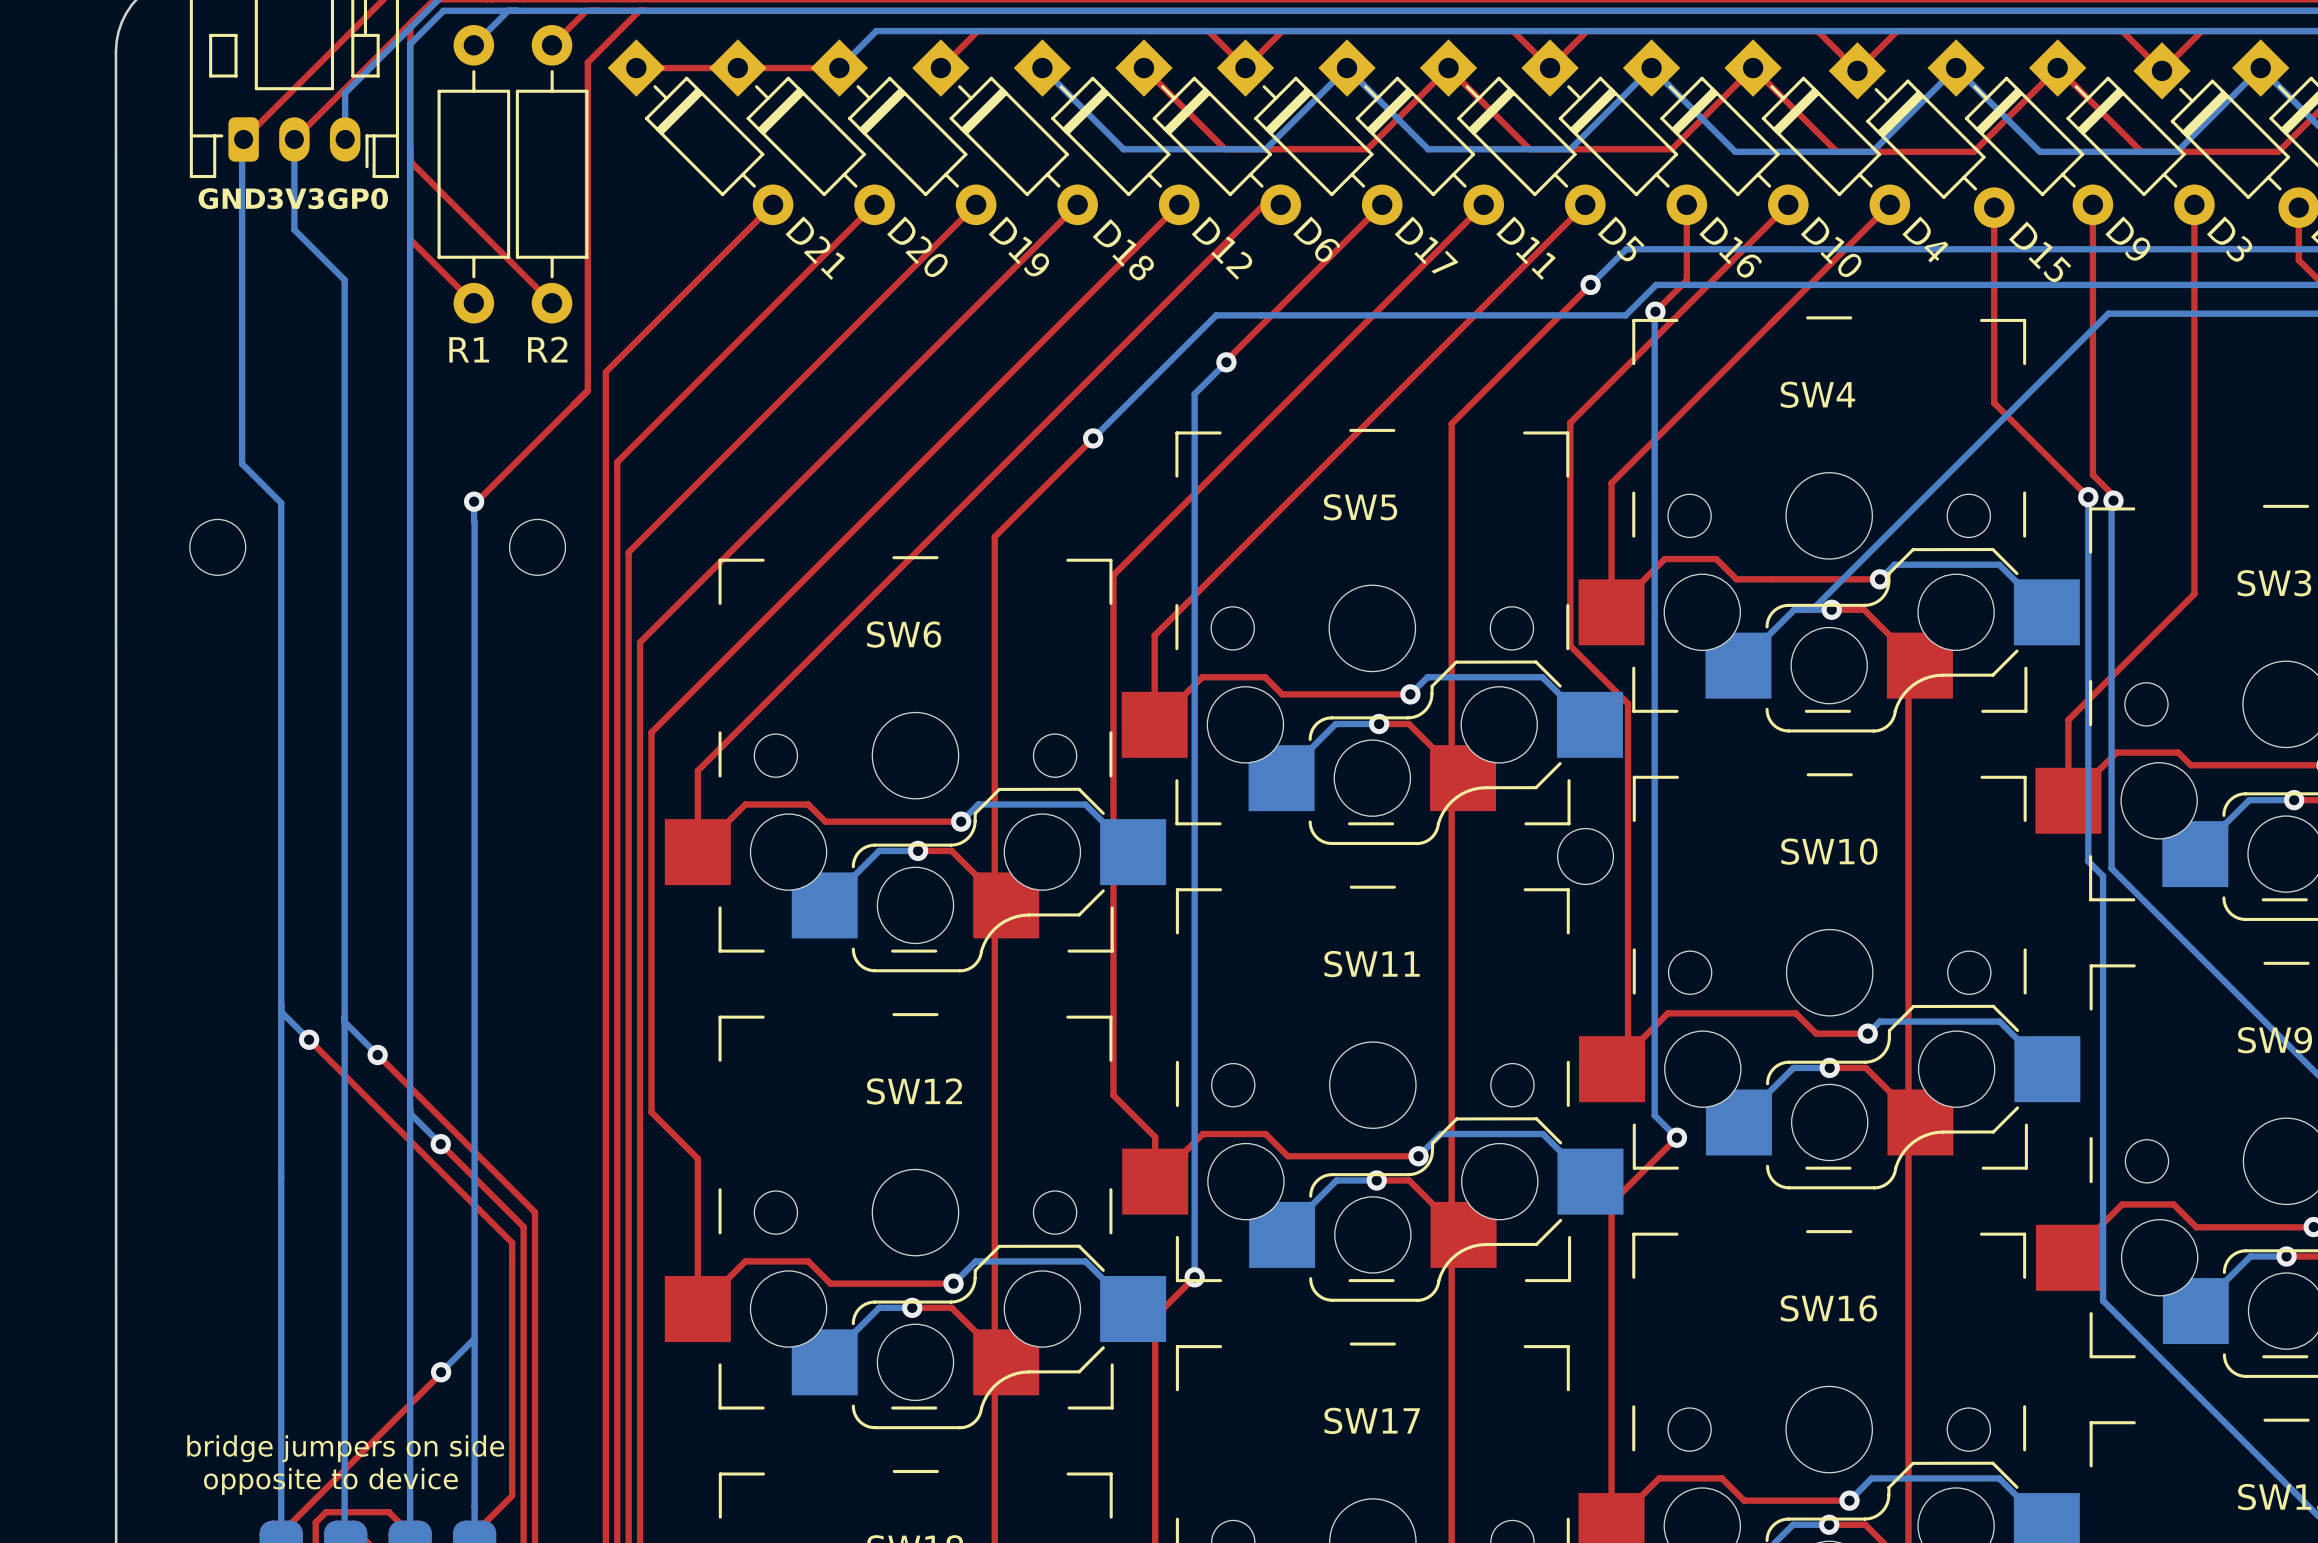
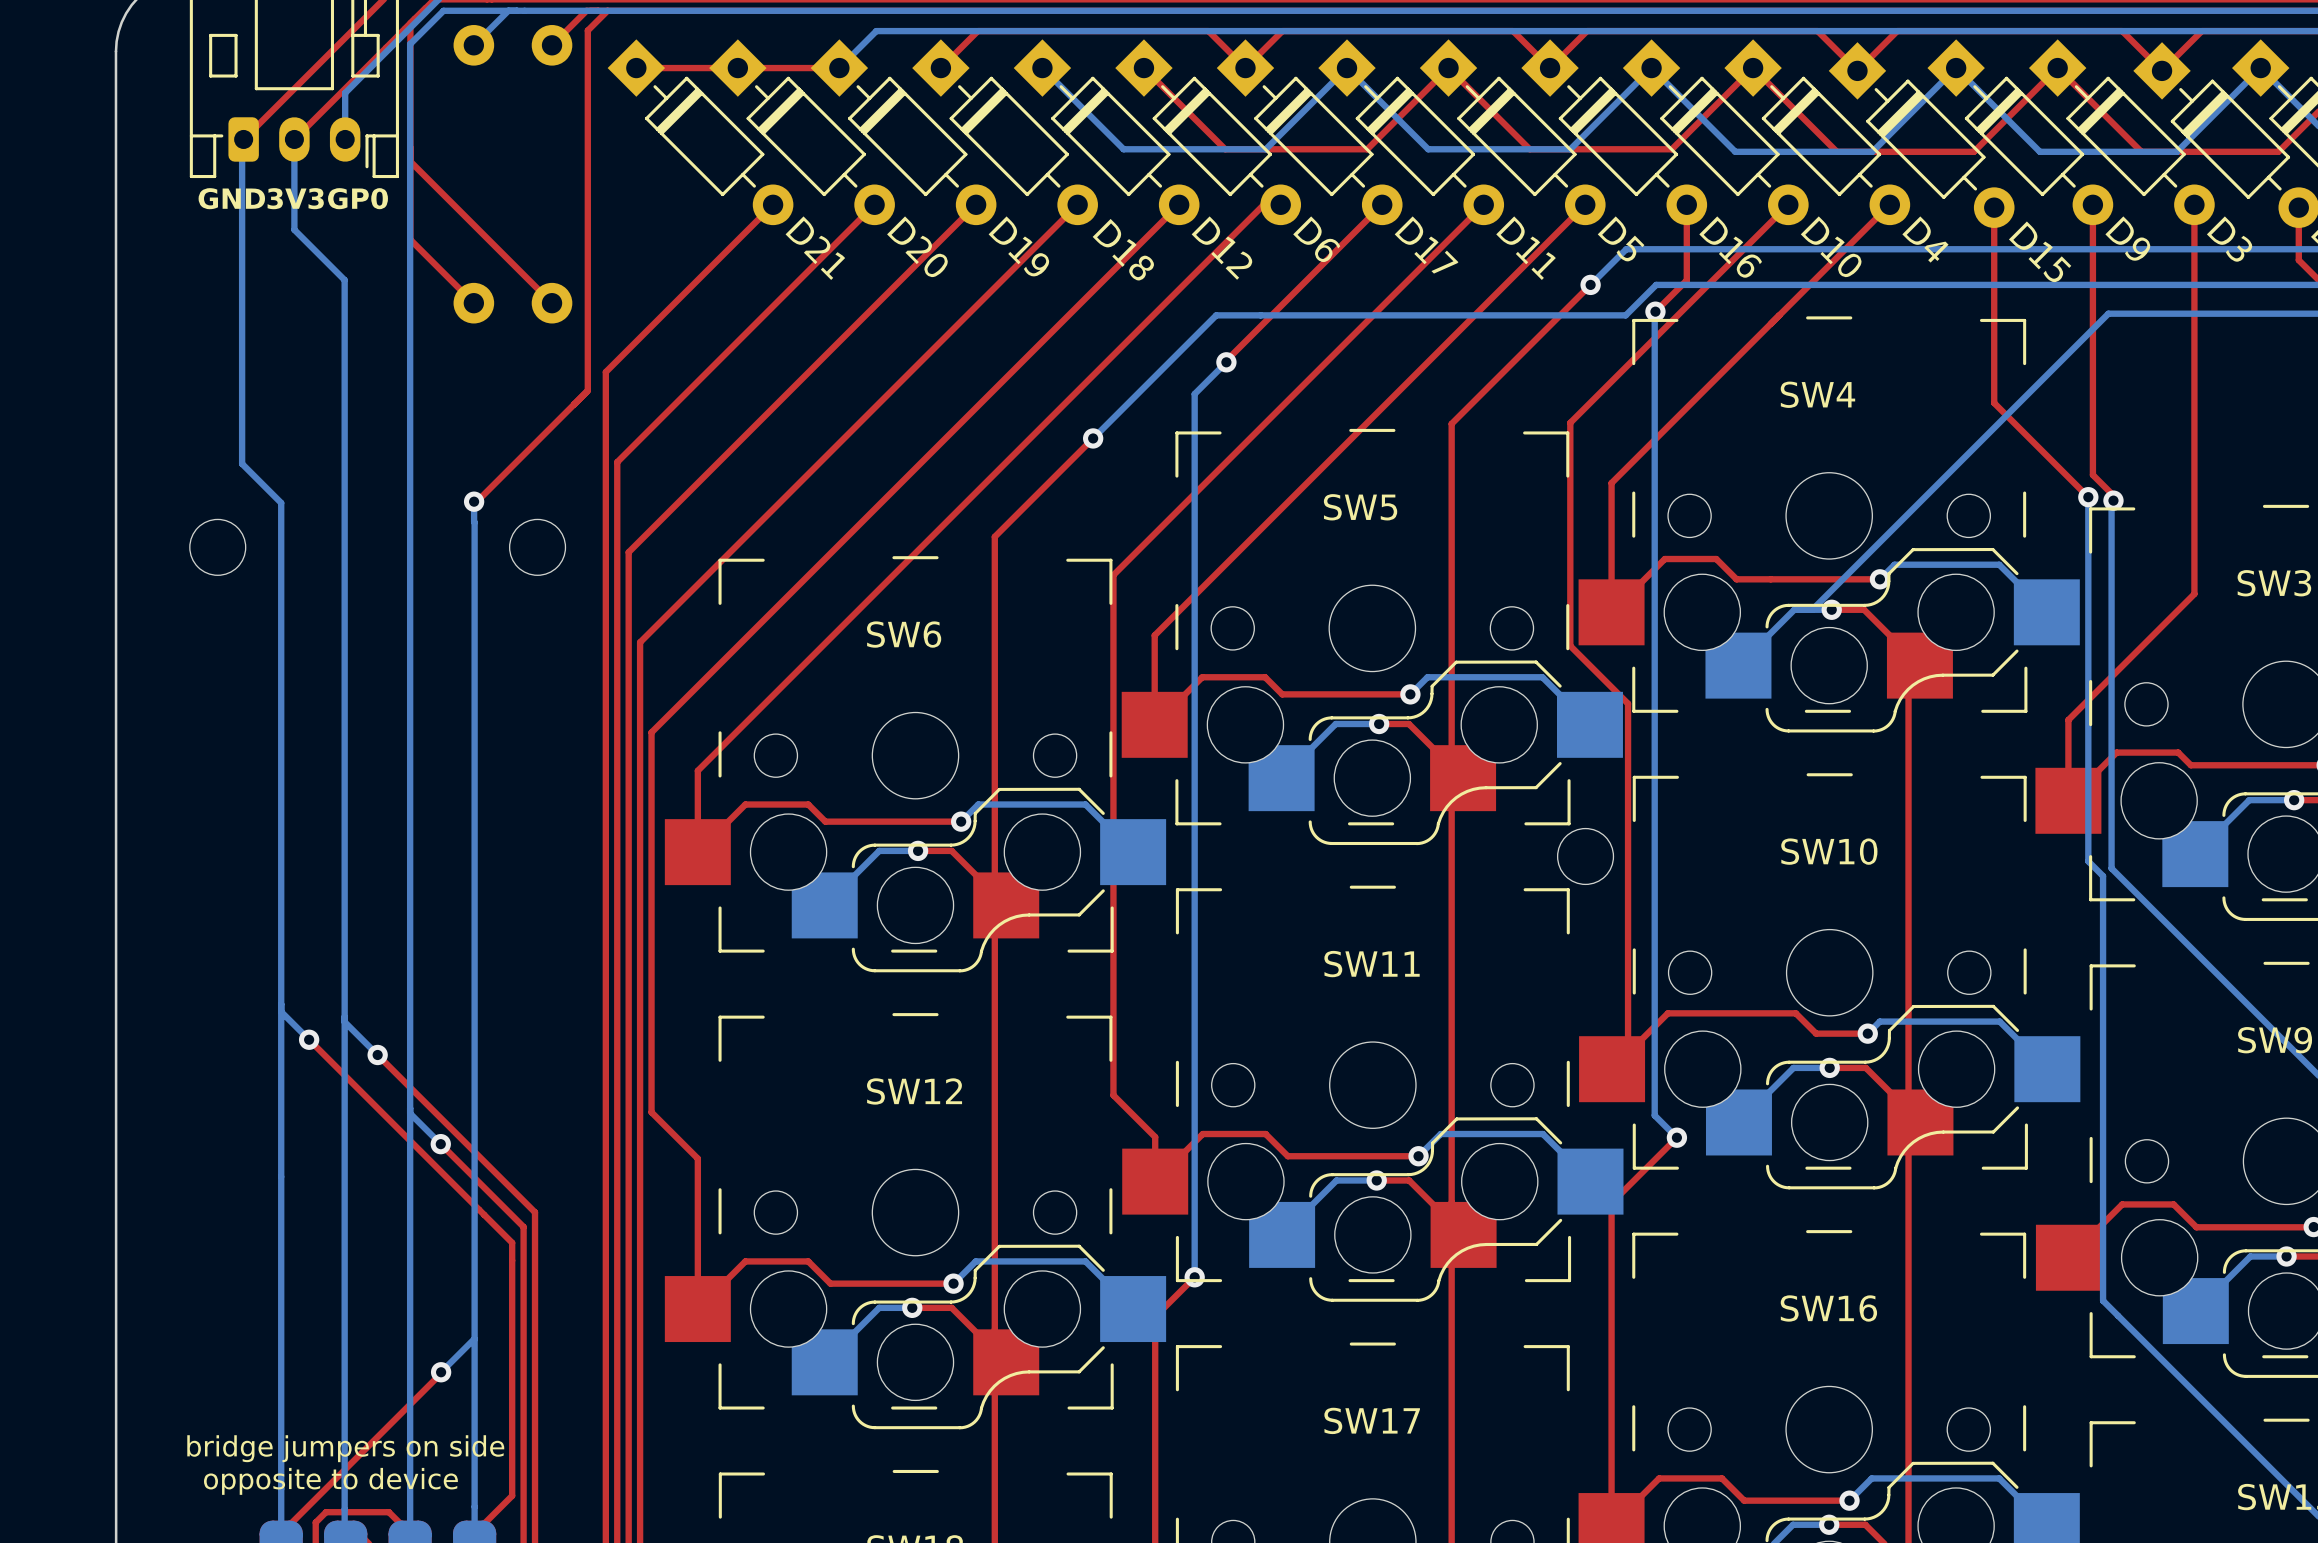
top track: (639, 10) (587, 62) -> (607, 10) (587, 30) (587, 62)
drawing: [437, 70, 589, 279] -> none
text: R1 (469, 349) -> none
text: R2 (547, 349) -> none

